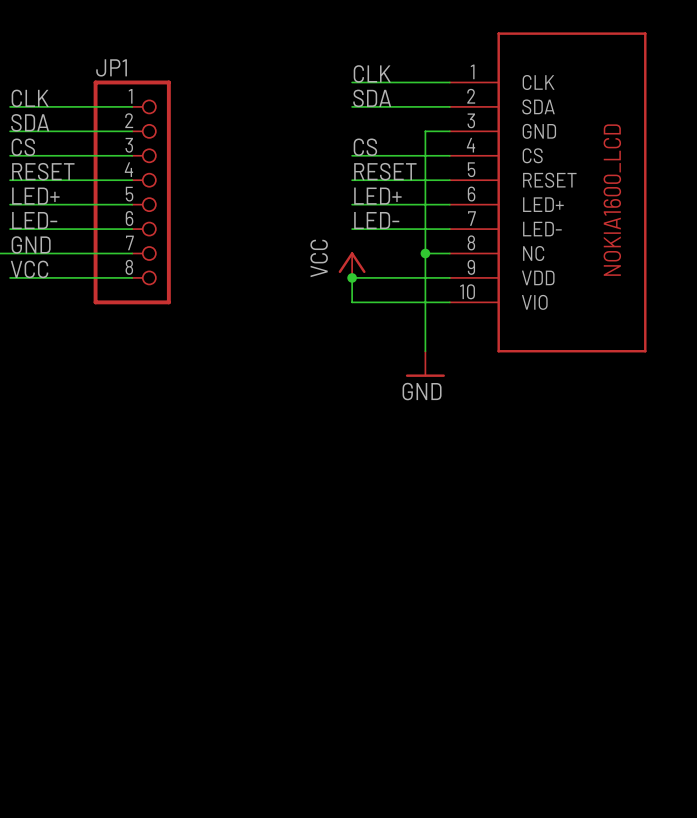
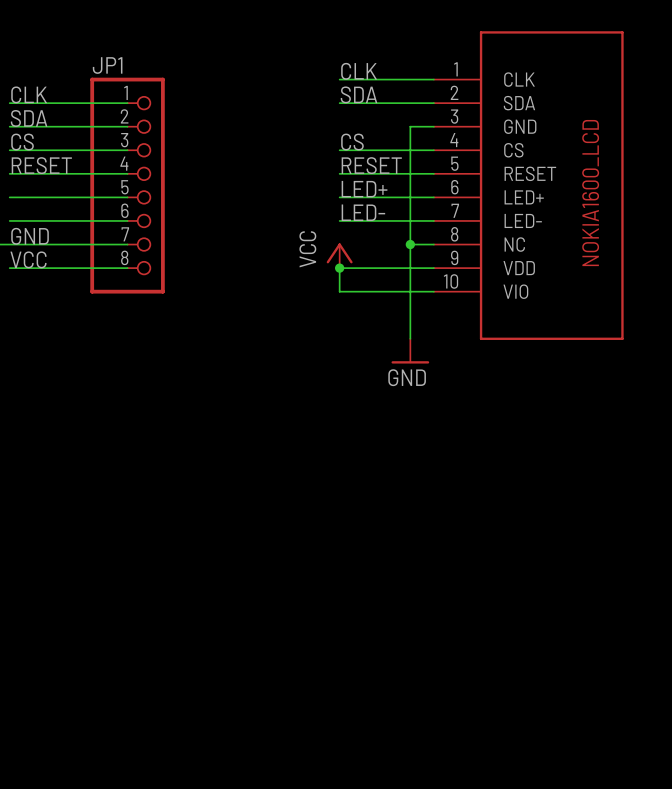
label: LED+ (35, 196) -> none
label: LED- (34, 220) -> none

